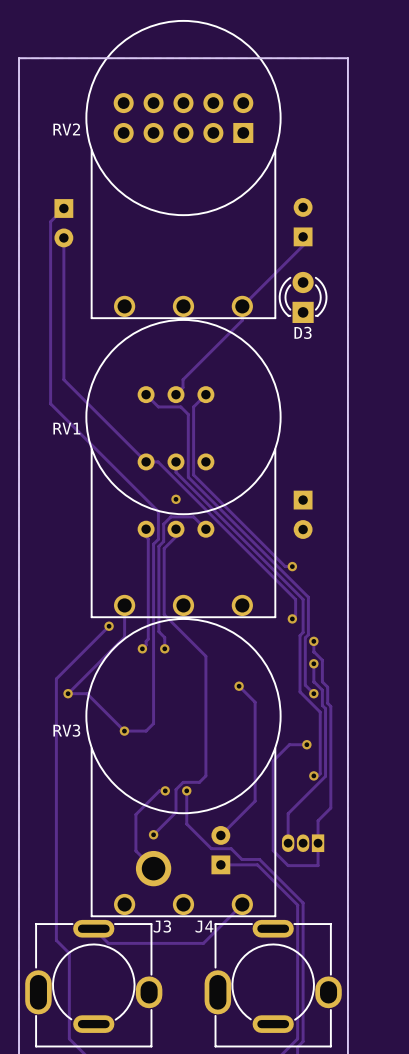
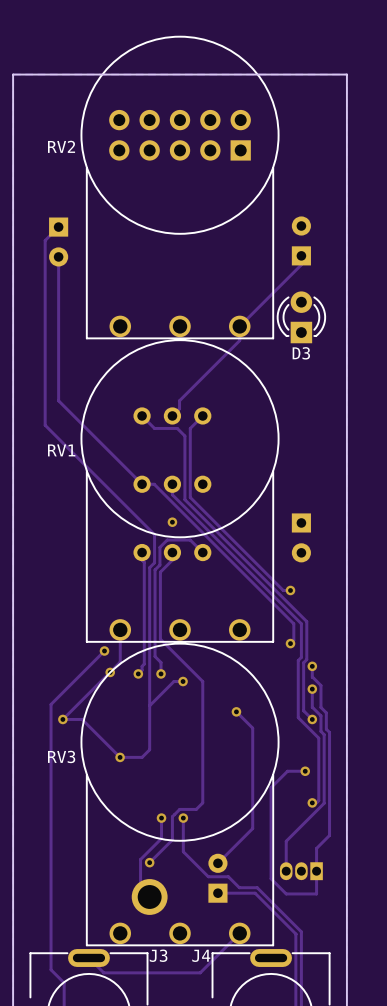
via: none -> (110, 672)
track: none -> (183, 681) (173, 681) (149, 705)
via: none -> (183, 681)
track: (165, 790) (159, 790) (135, 814) (135, 850) (144, 859) -> (161, 818) (161, 838) (140, 859) (140, 887)

